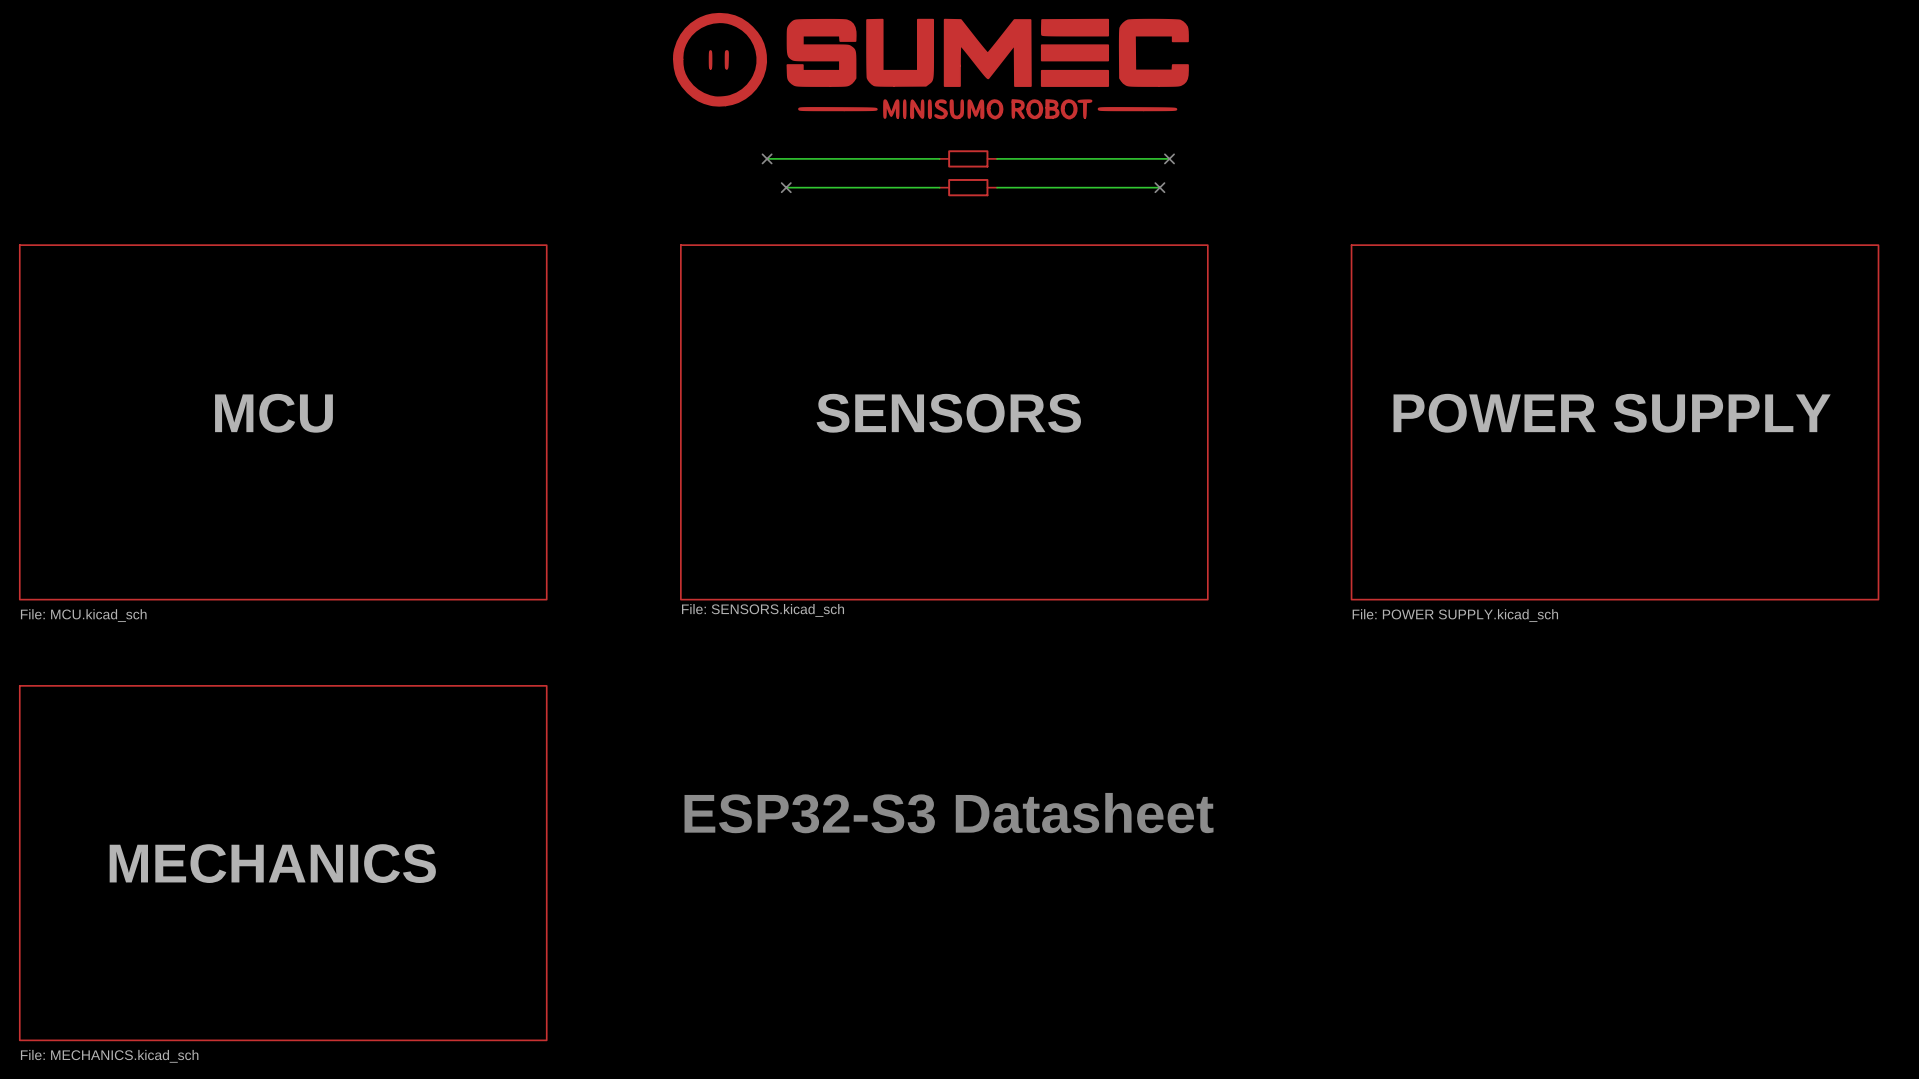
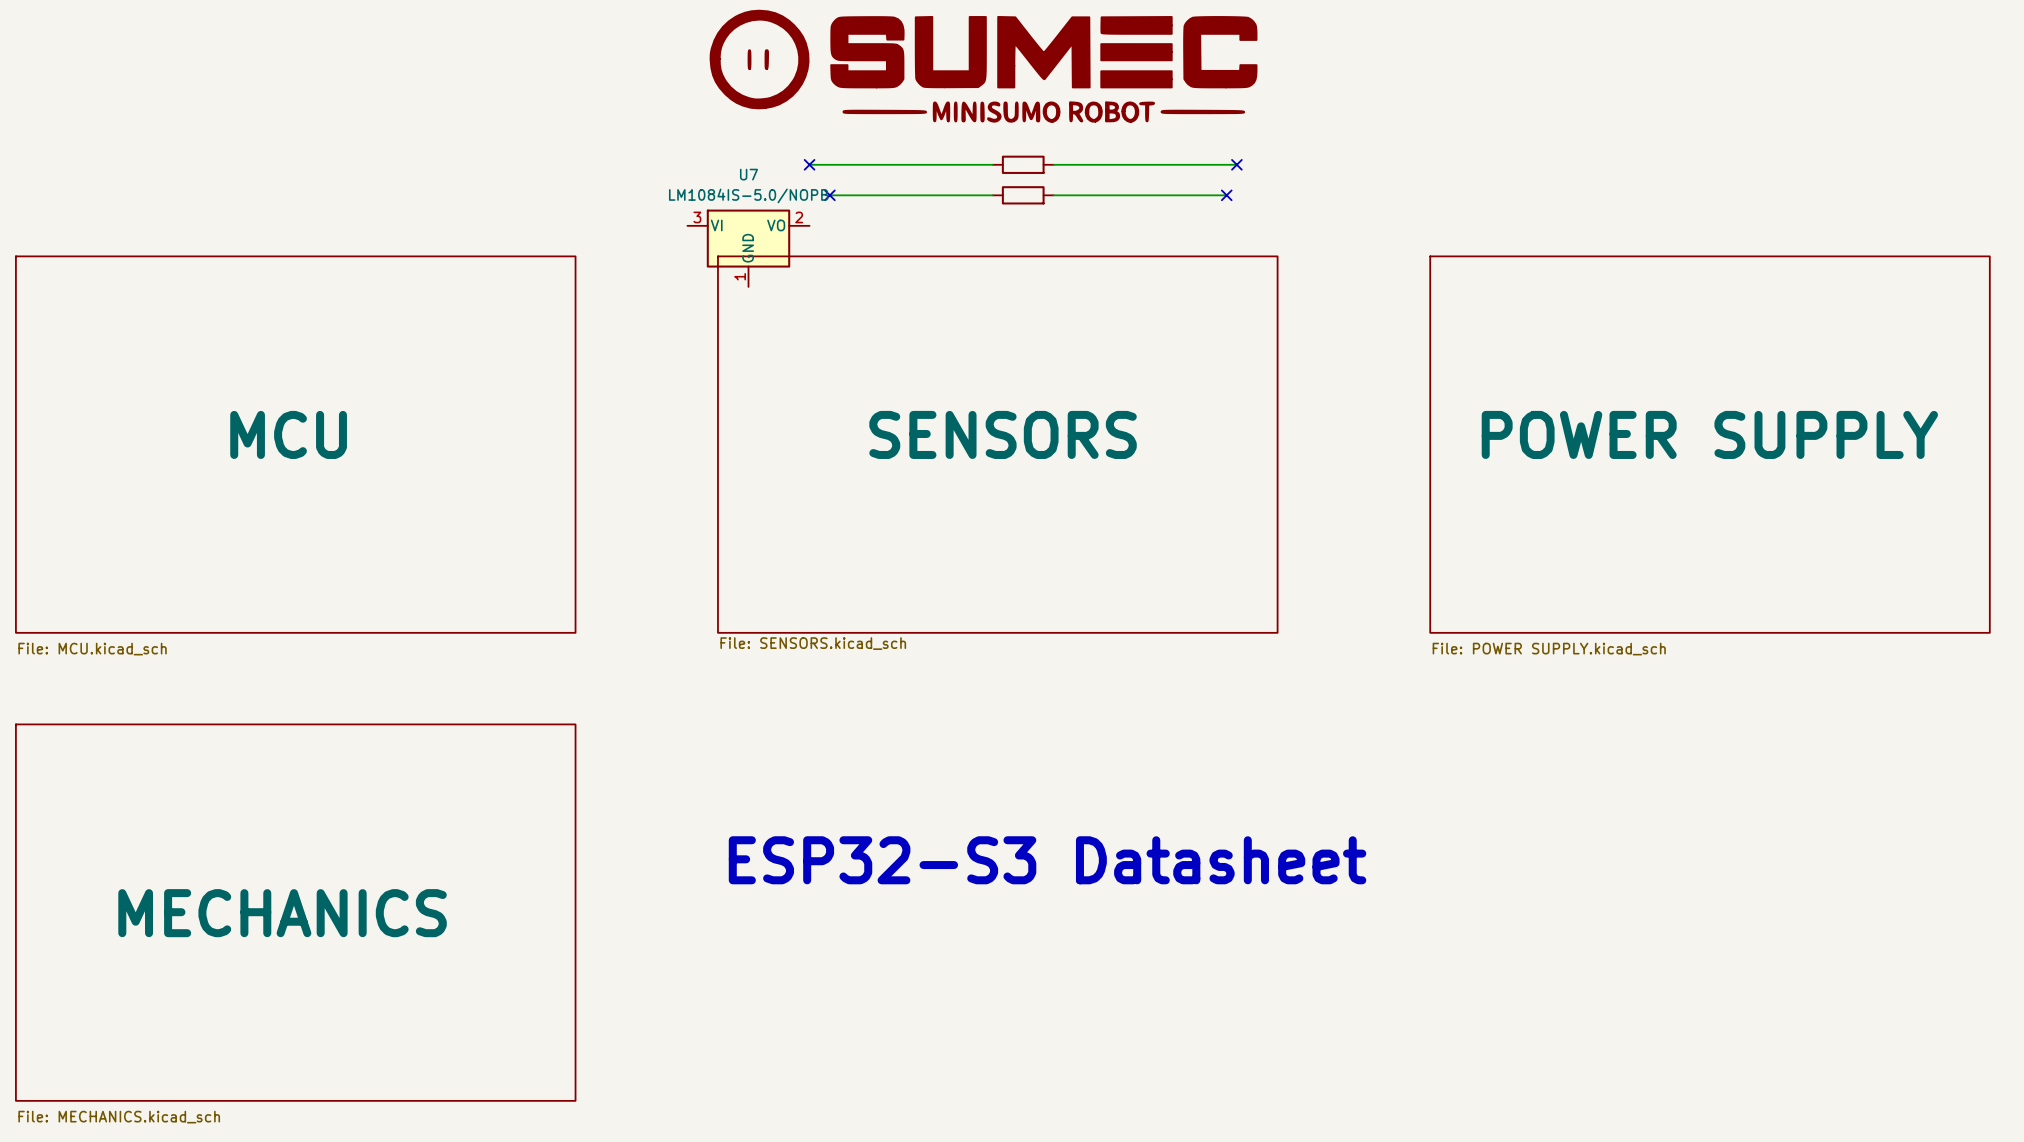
U7: none -> LM1084IS-5.0/NOPB (748, 248)

